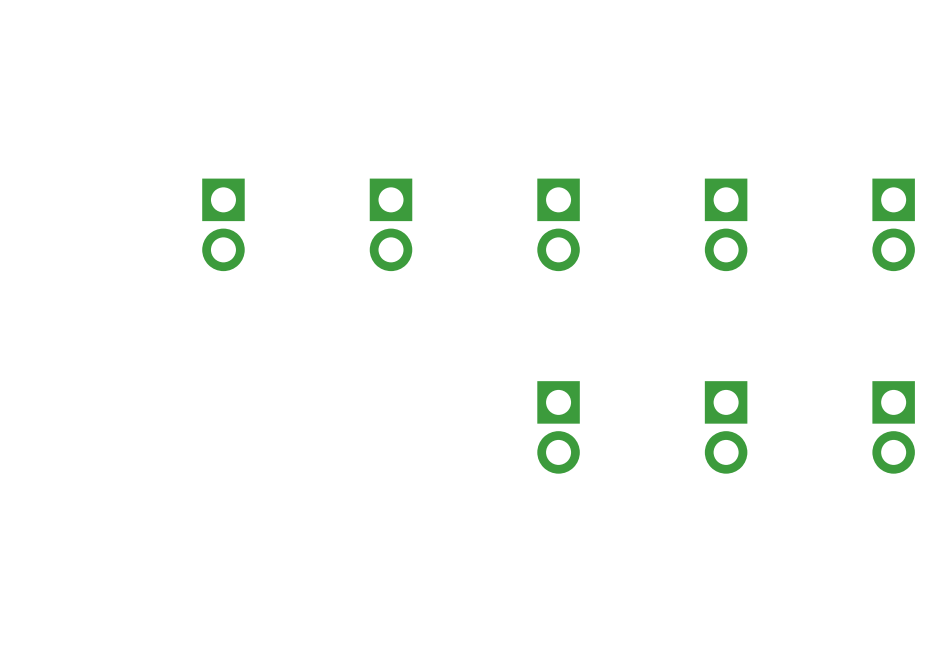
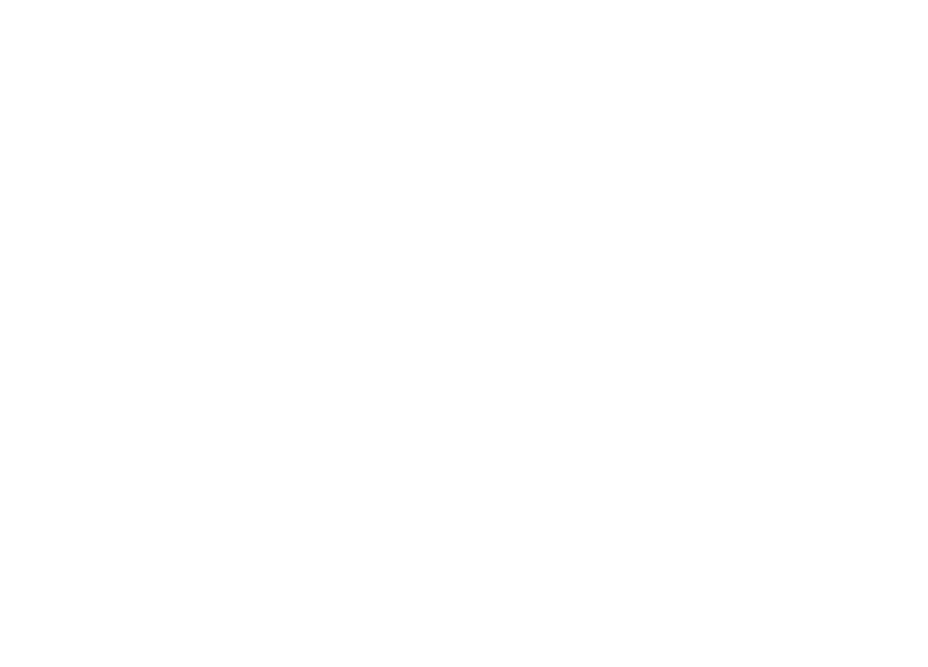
part: (223, 224) -> none
part: (391, 224) -> none
part: (558, 224) -> none
part: (726, 224) -> none
part: (893, 224) -> none
part: (558, 427) -> none
part: (726, 427) -> none
part: (893, 427) -> none

